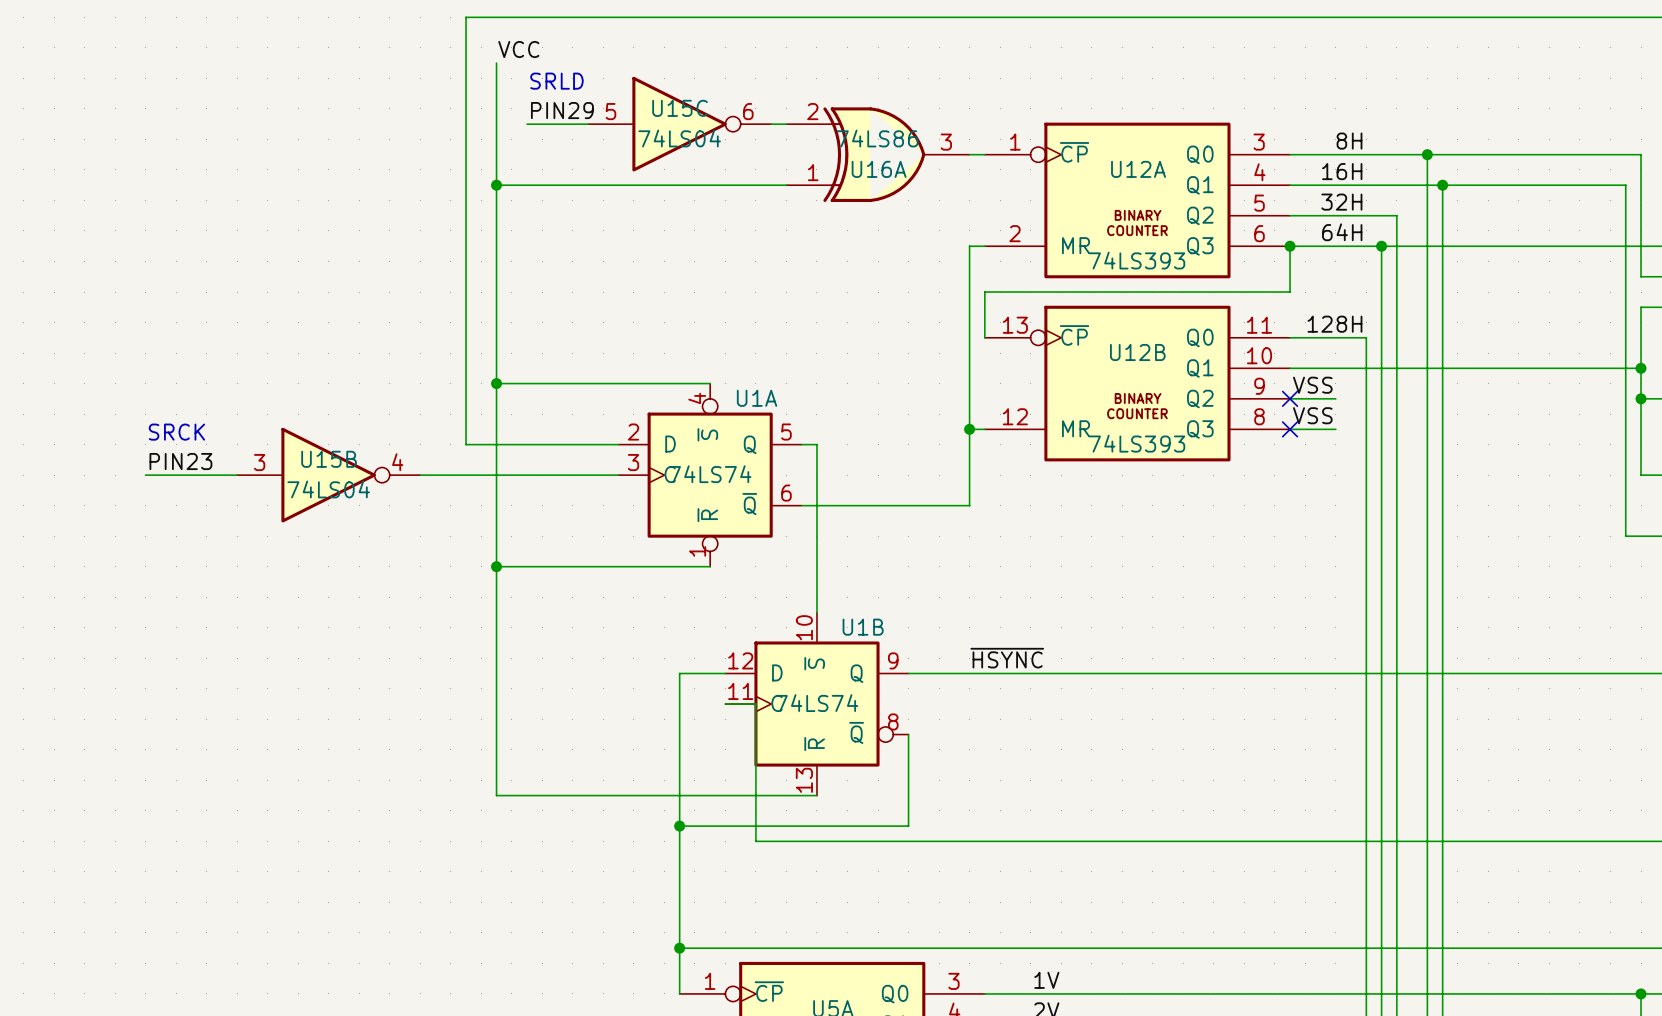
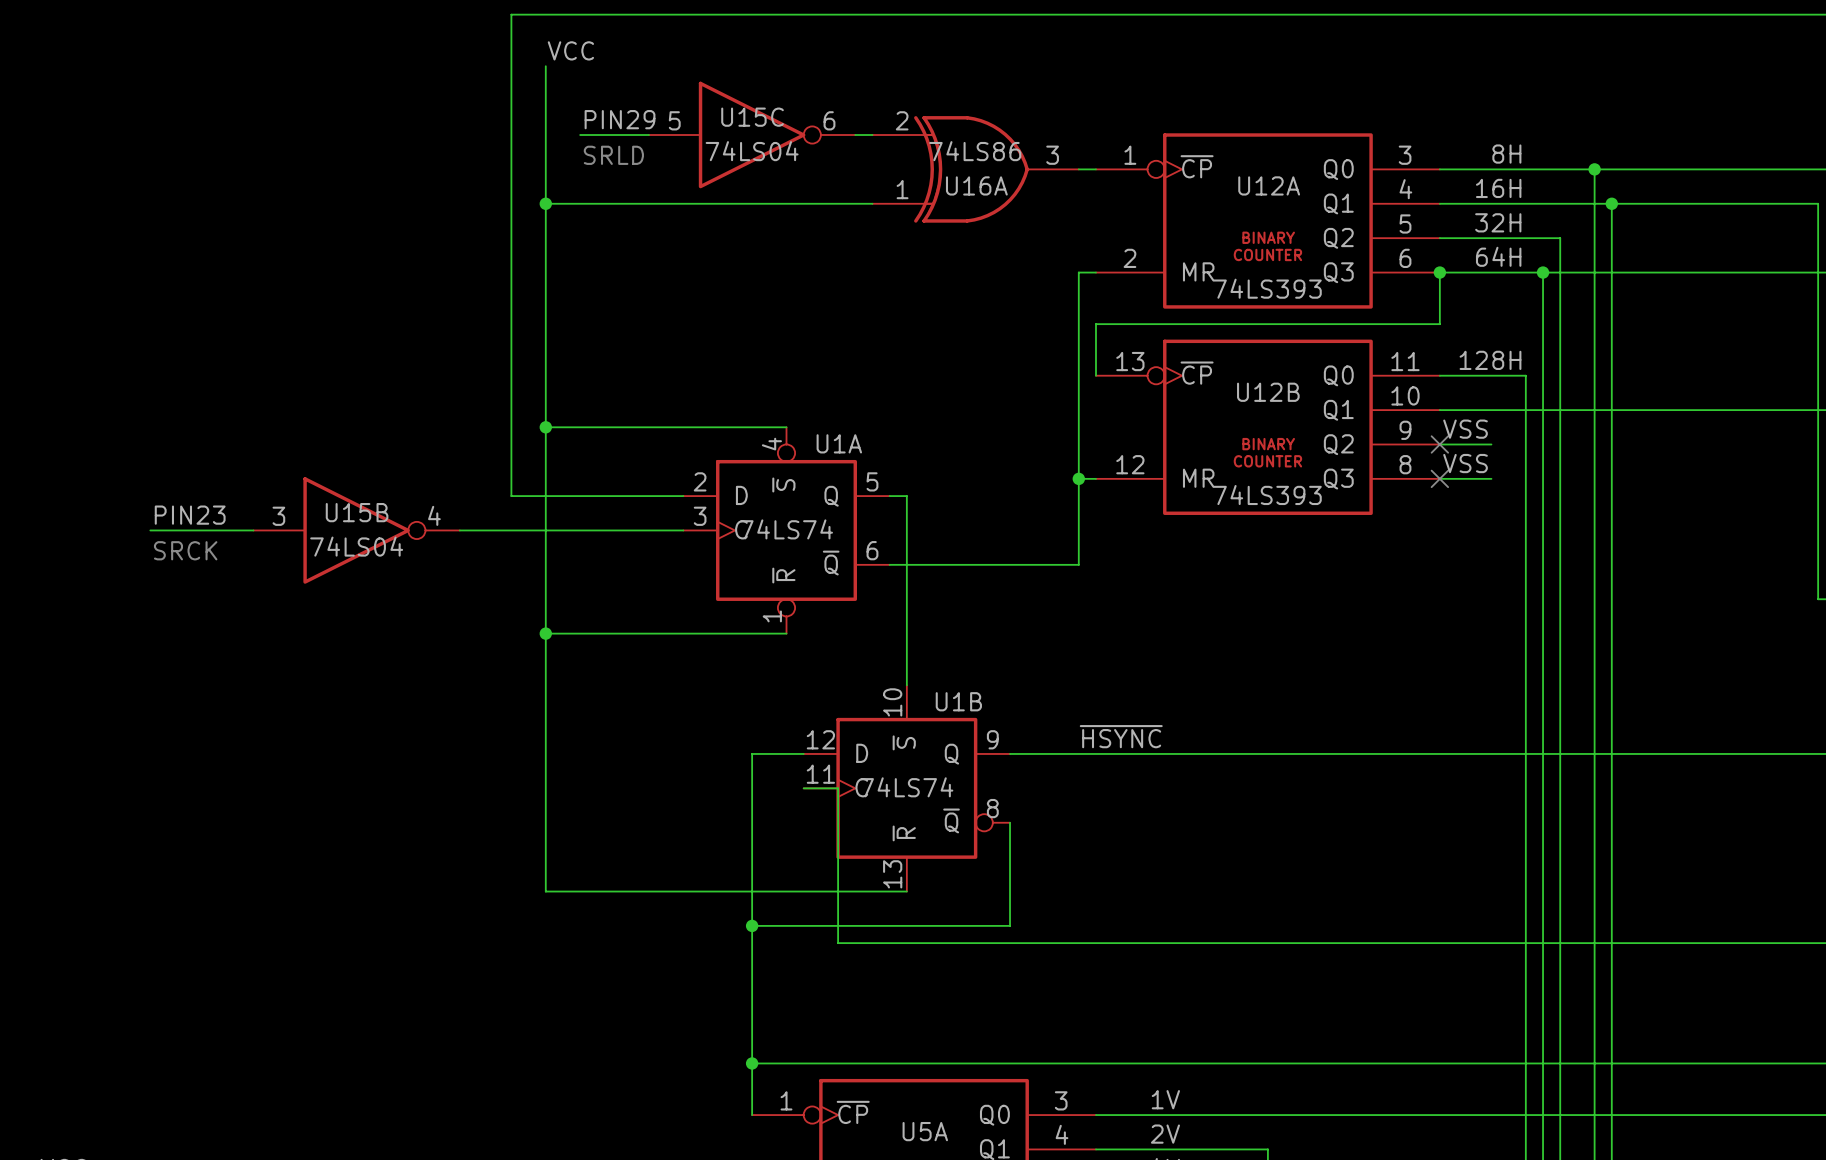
text position: SRLD (556, 81) -> SRLD (613, 155)
text position: SRCK (176, 432) -> SRCK (185, 550)

